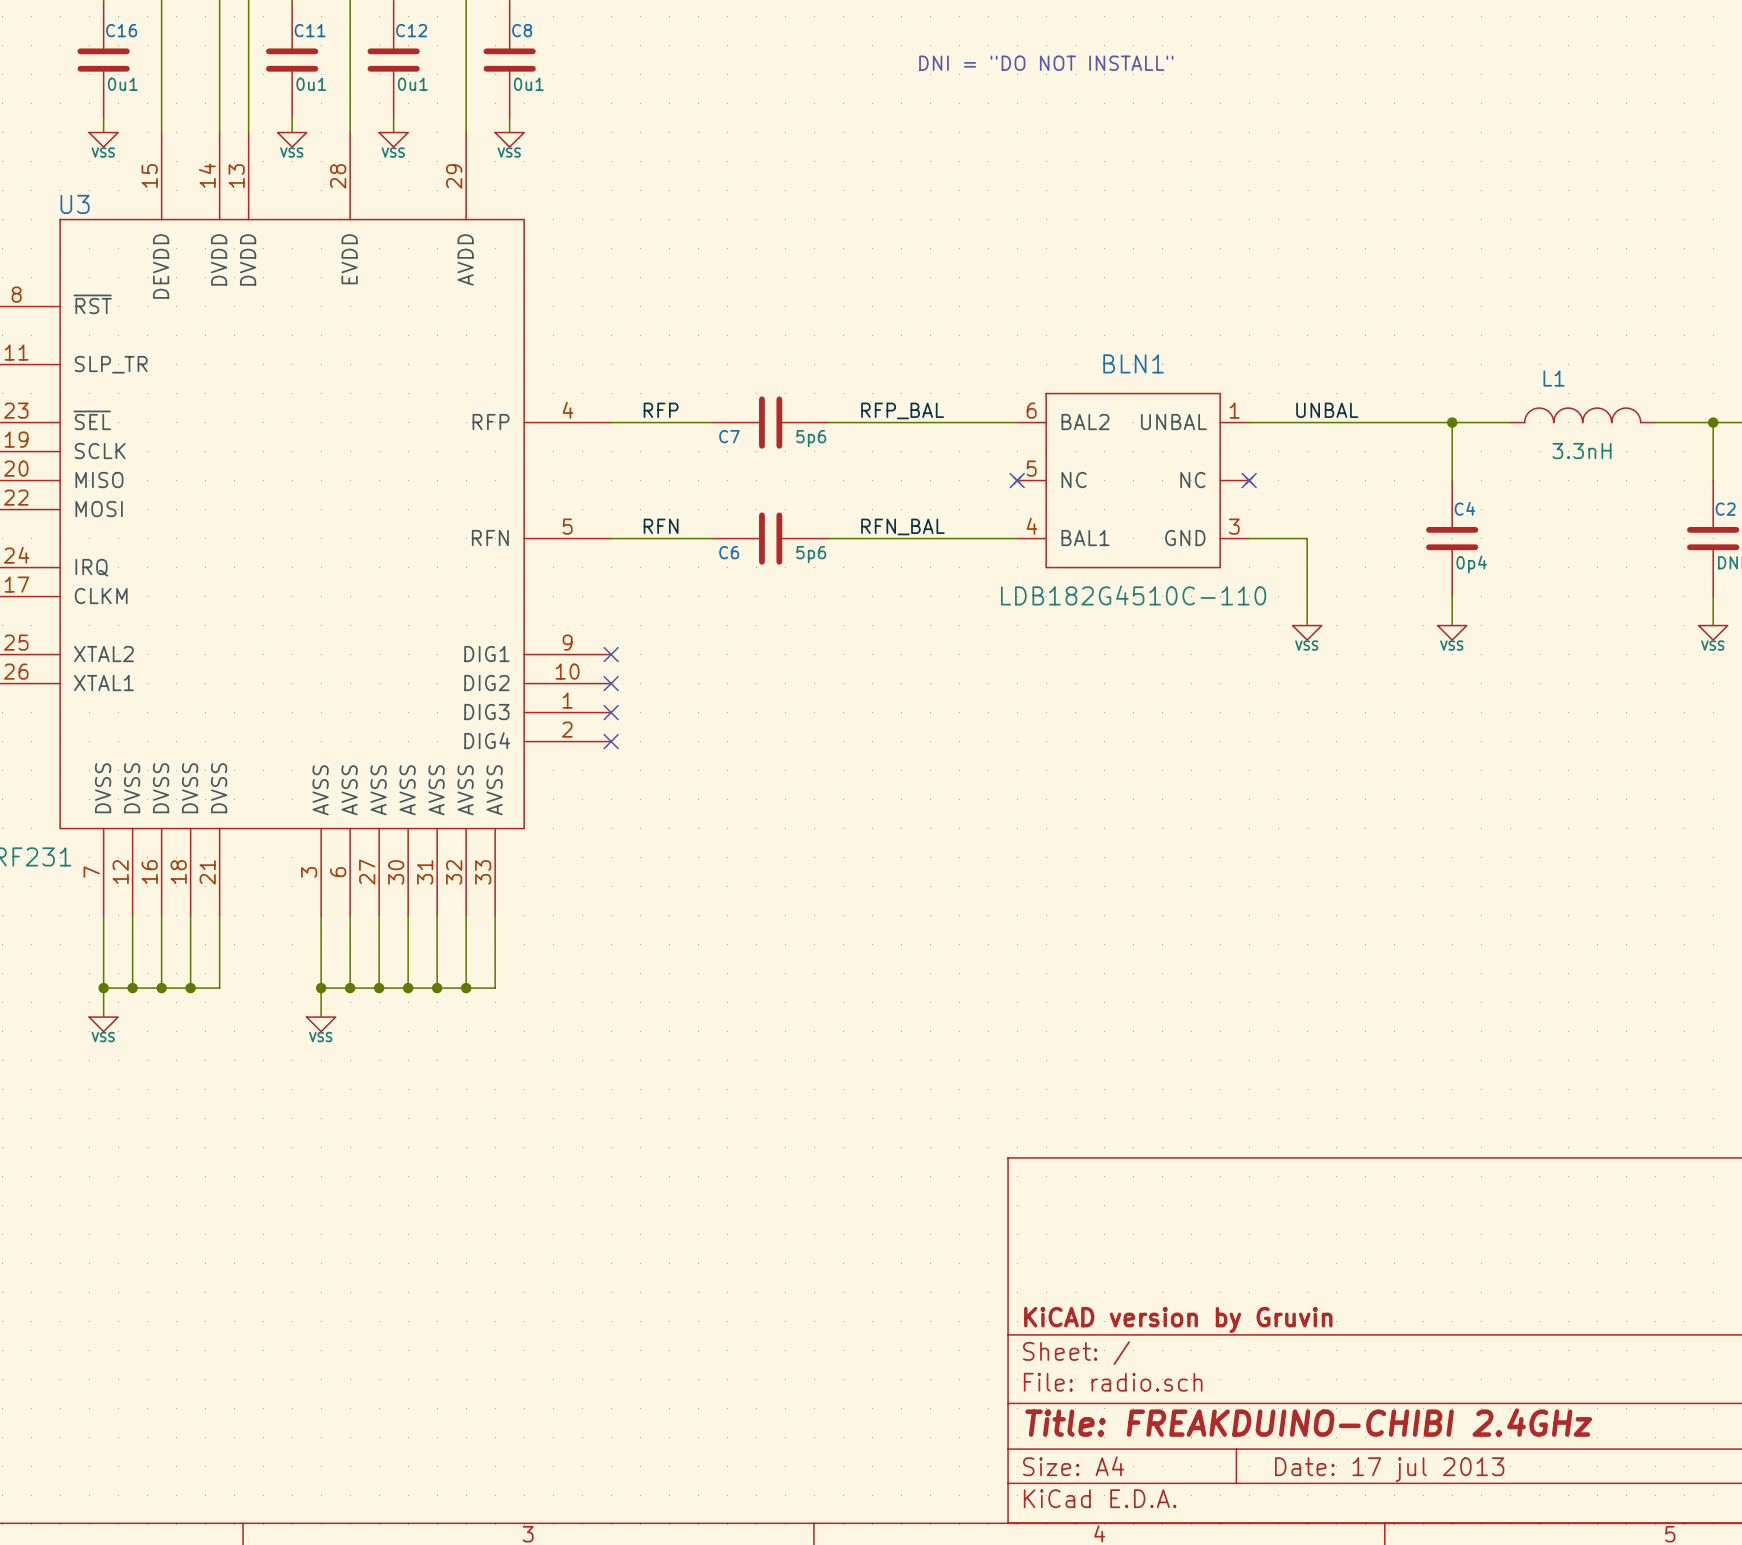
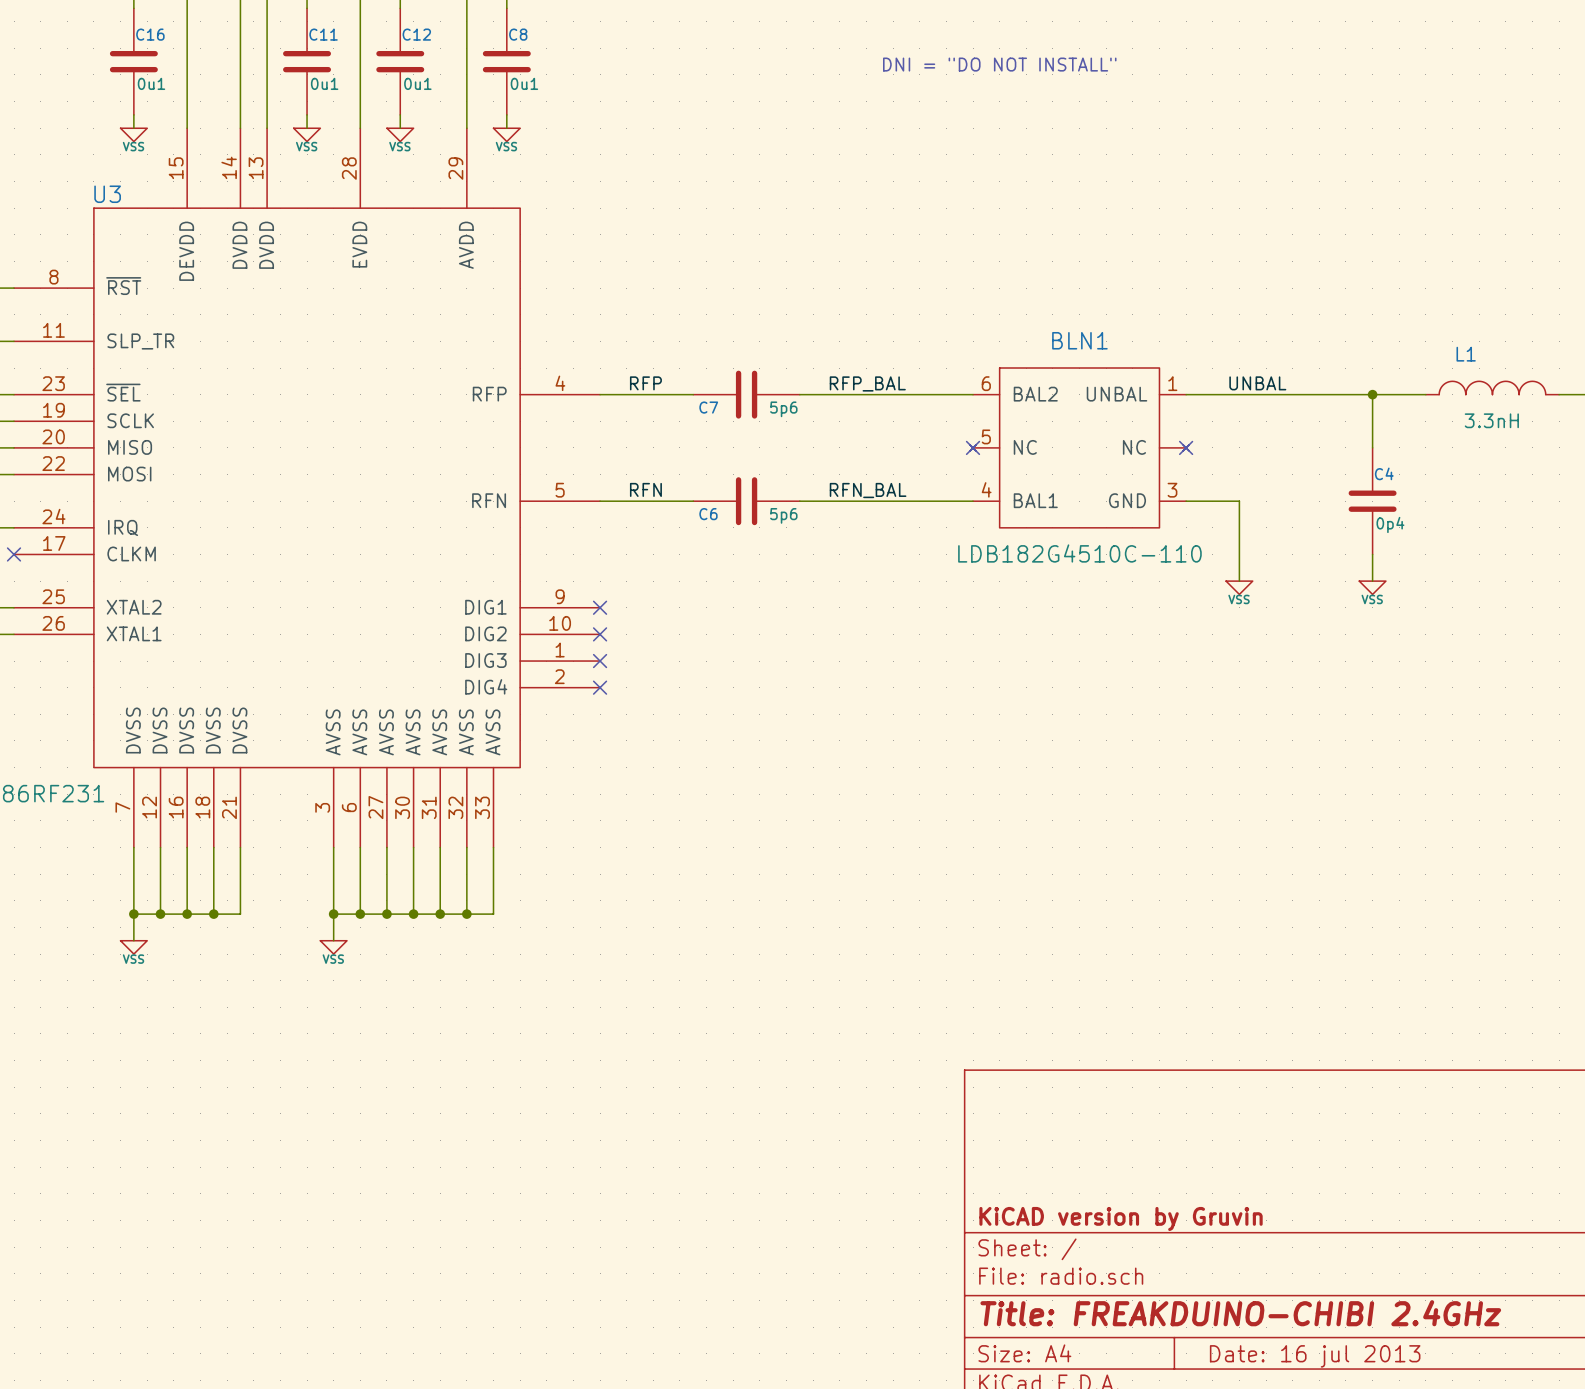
title block: Date: 17 jul 2013 (1389, 1469) -> Date: 16 jul 2013 (1315, 1356)

